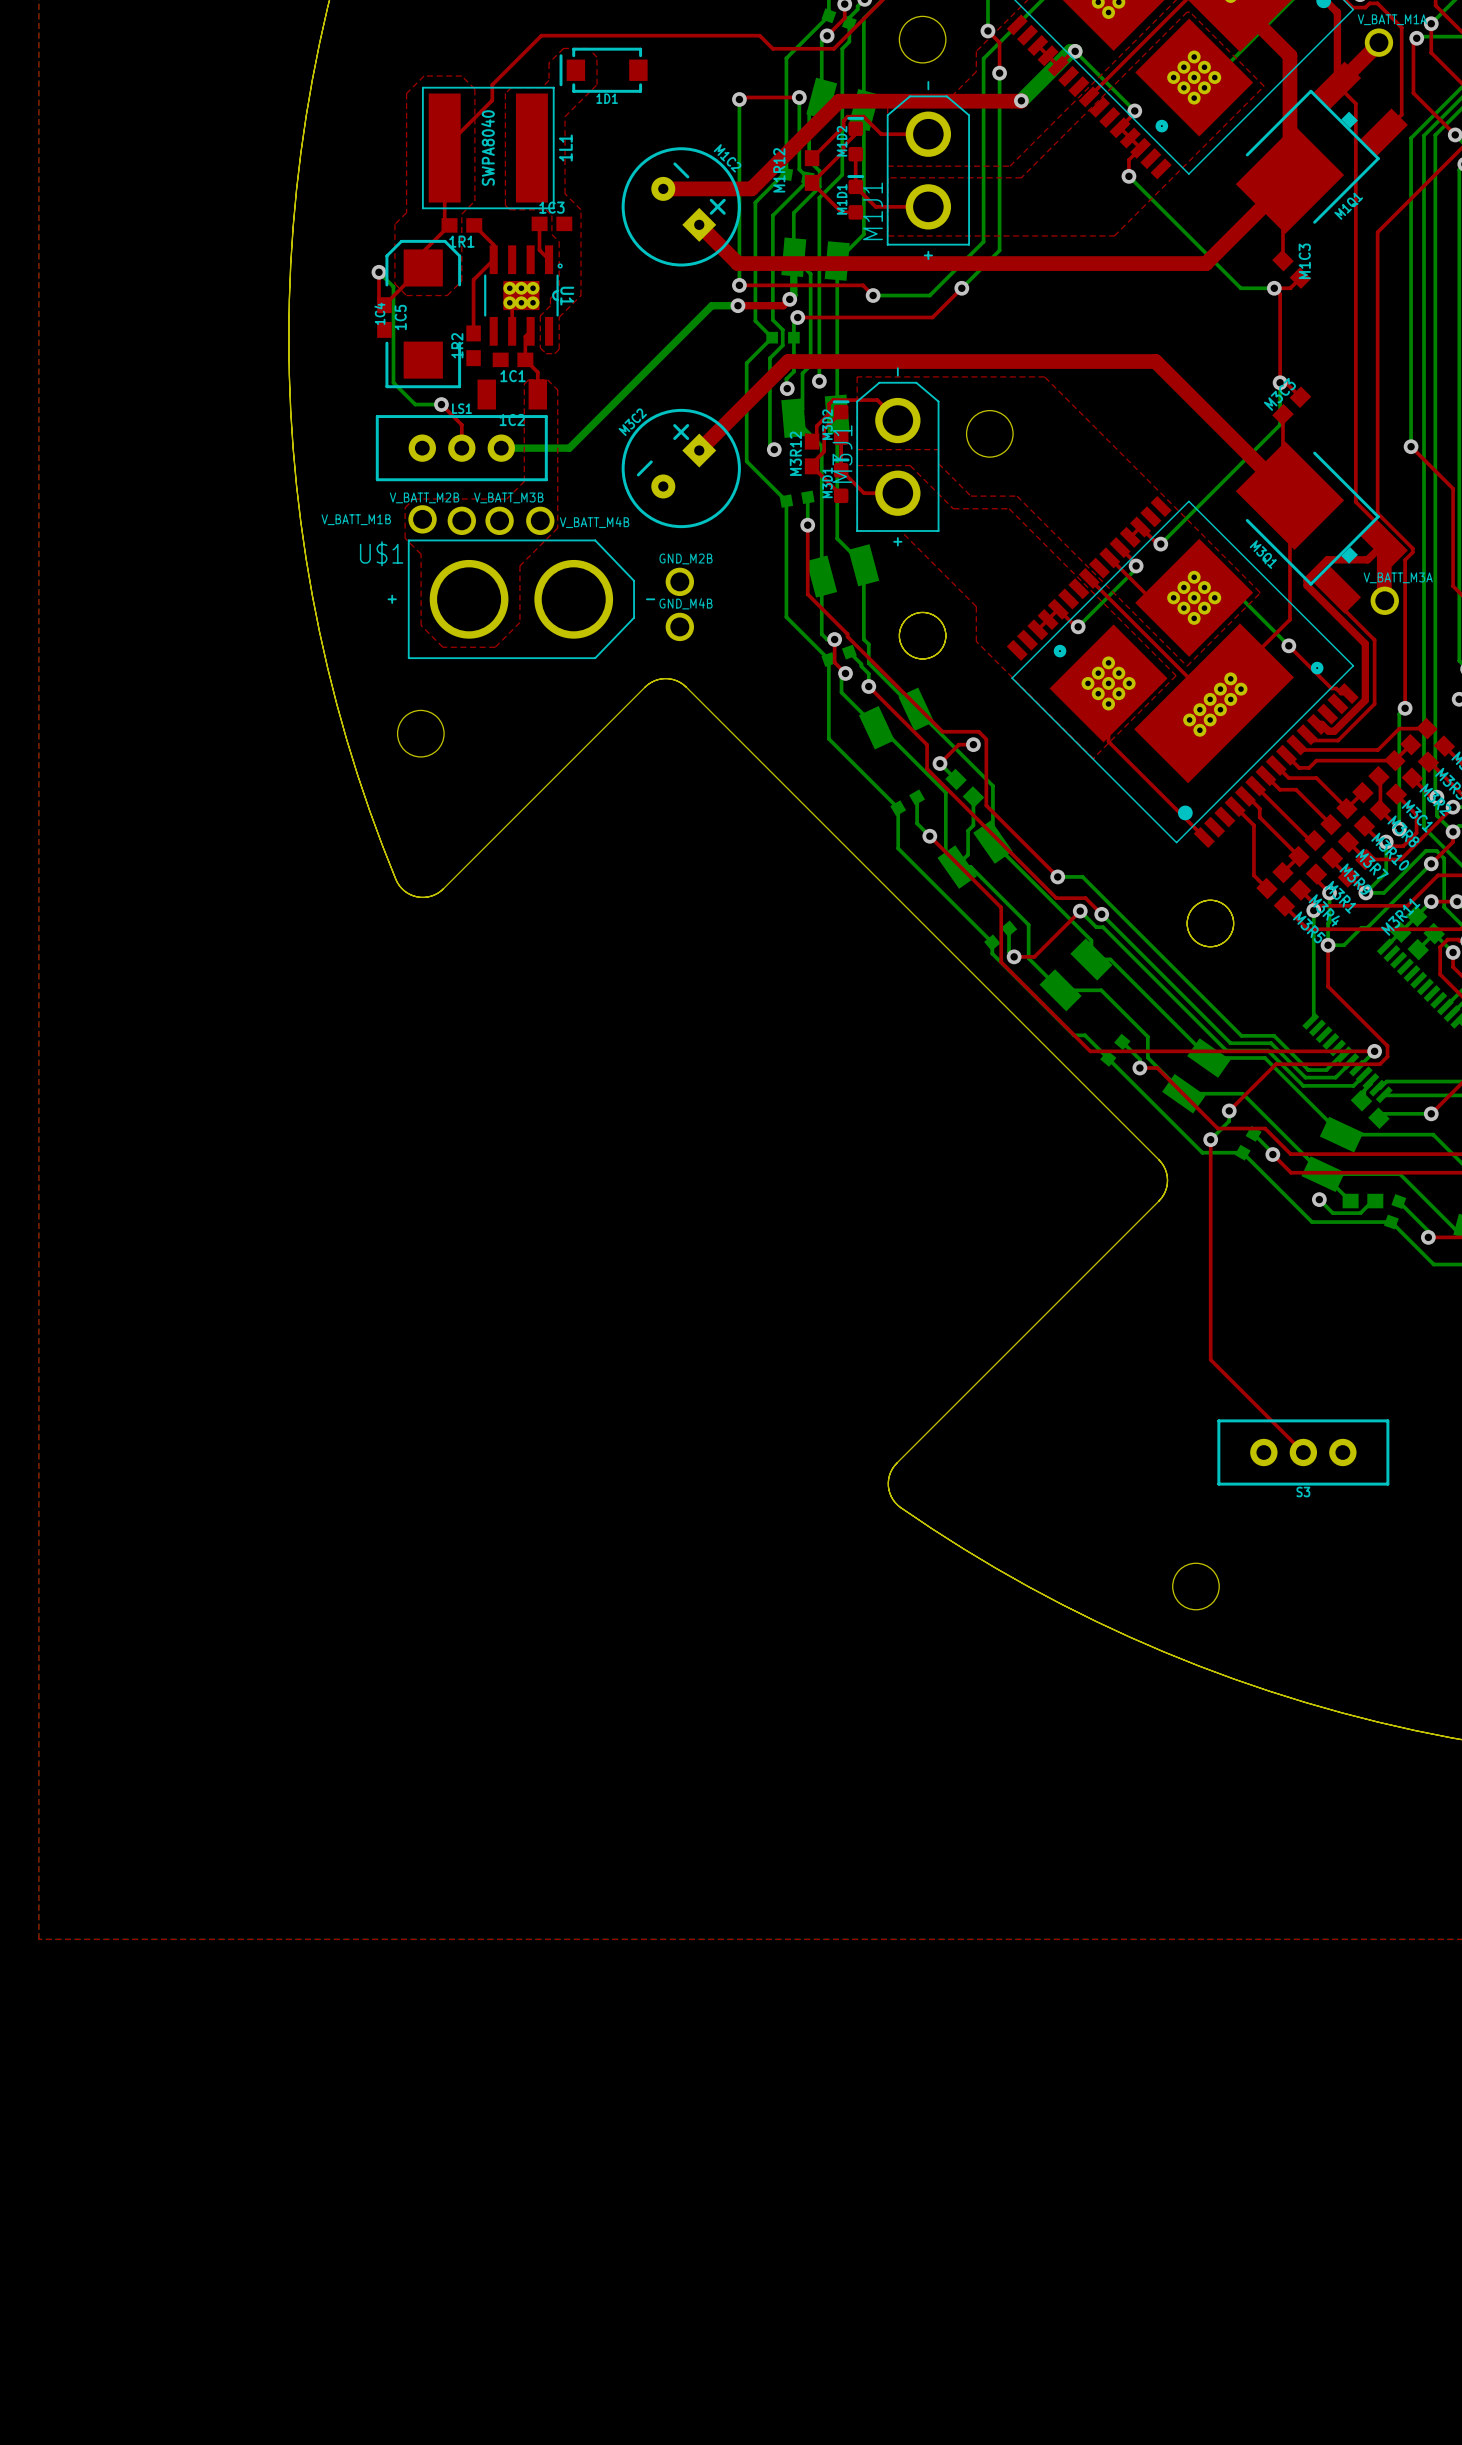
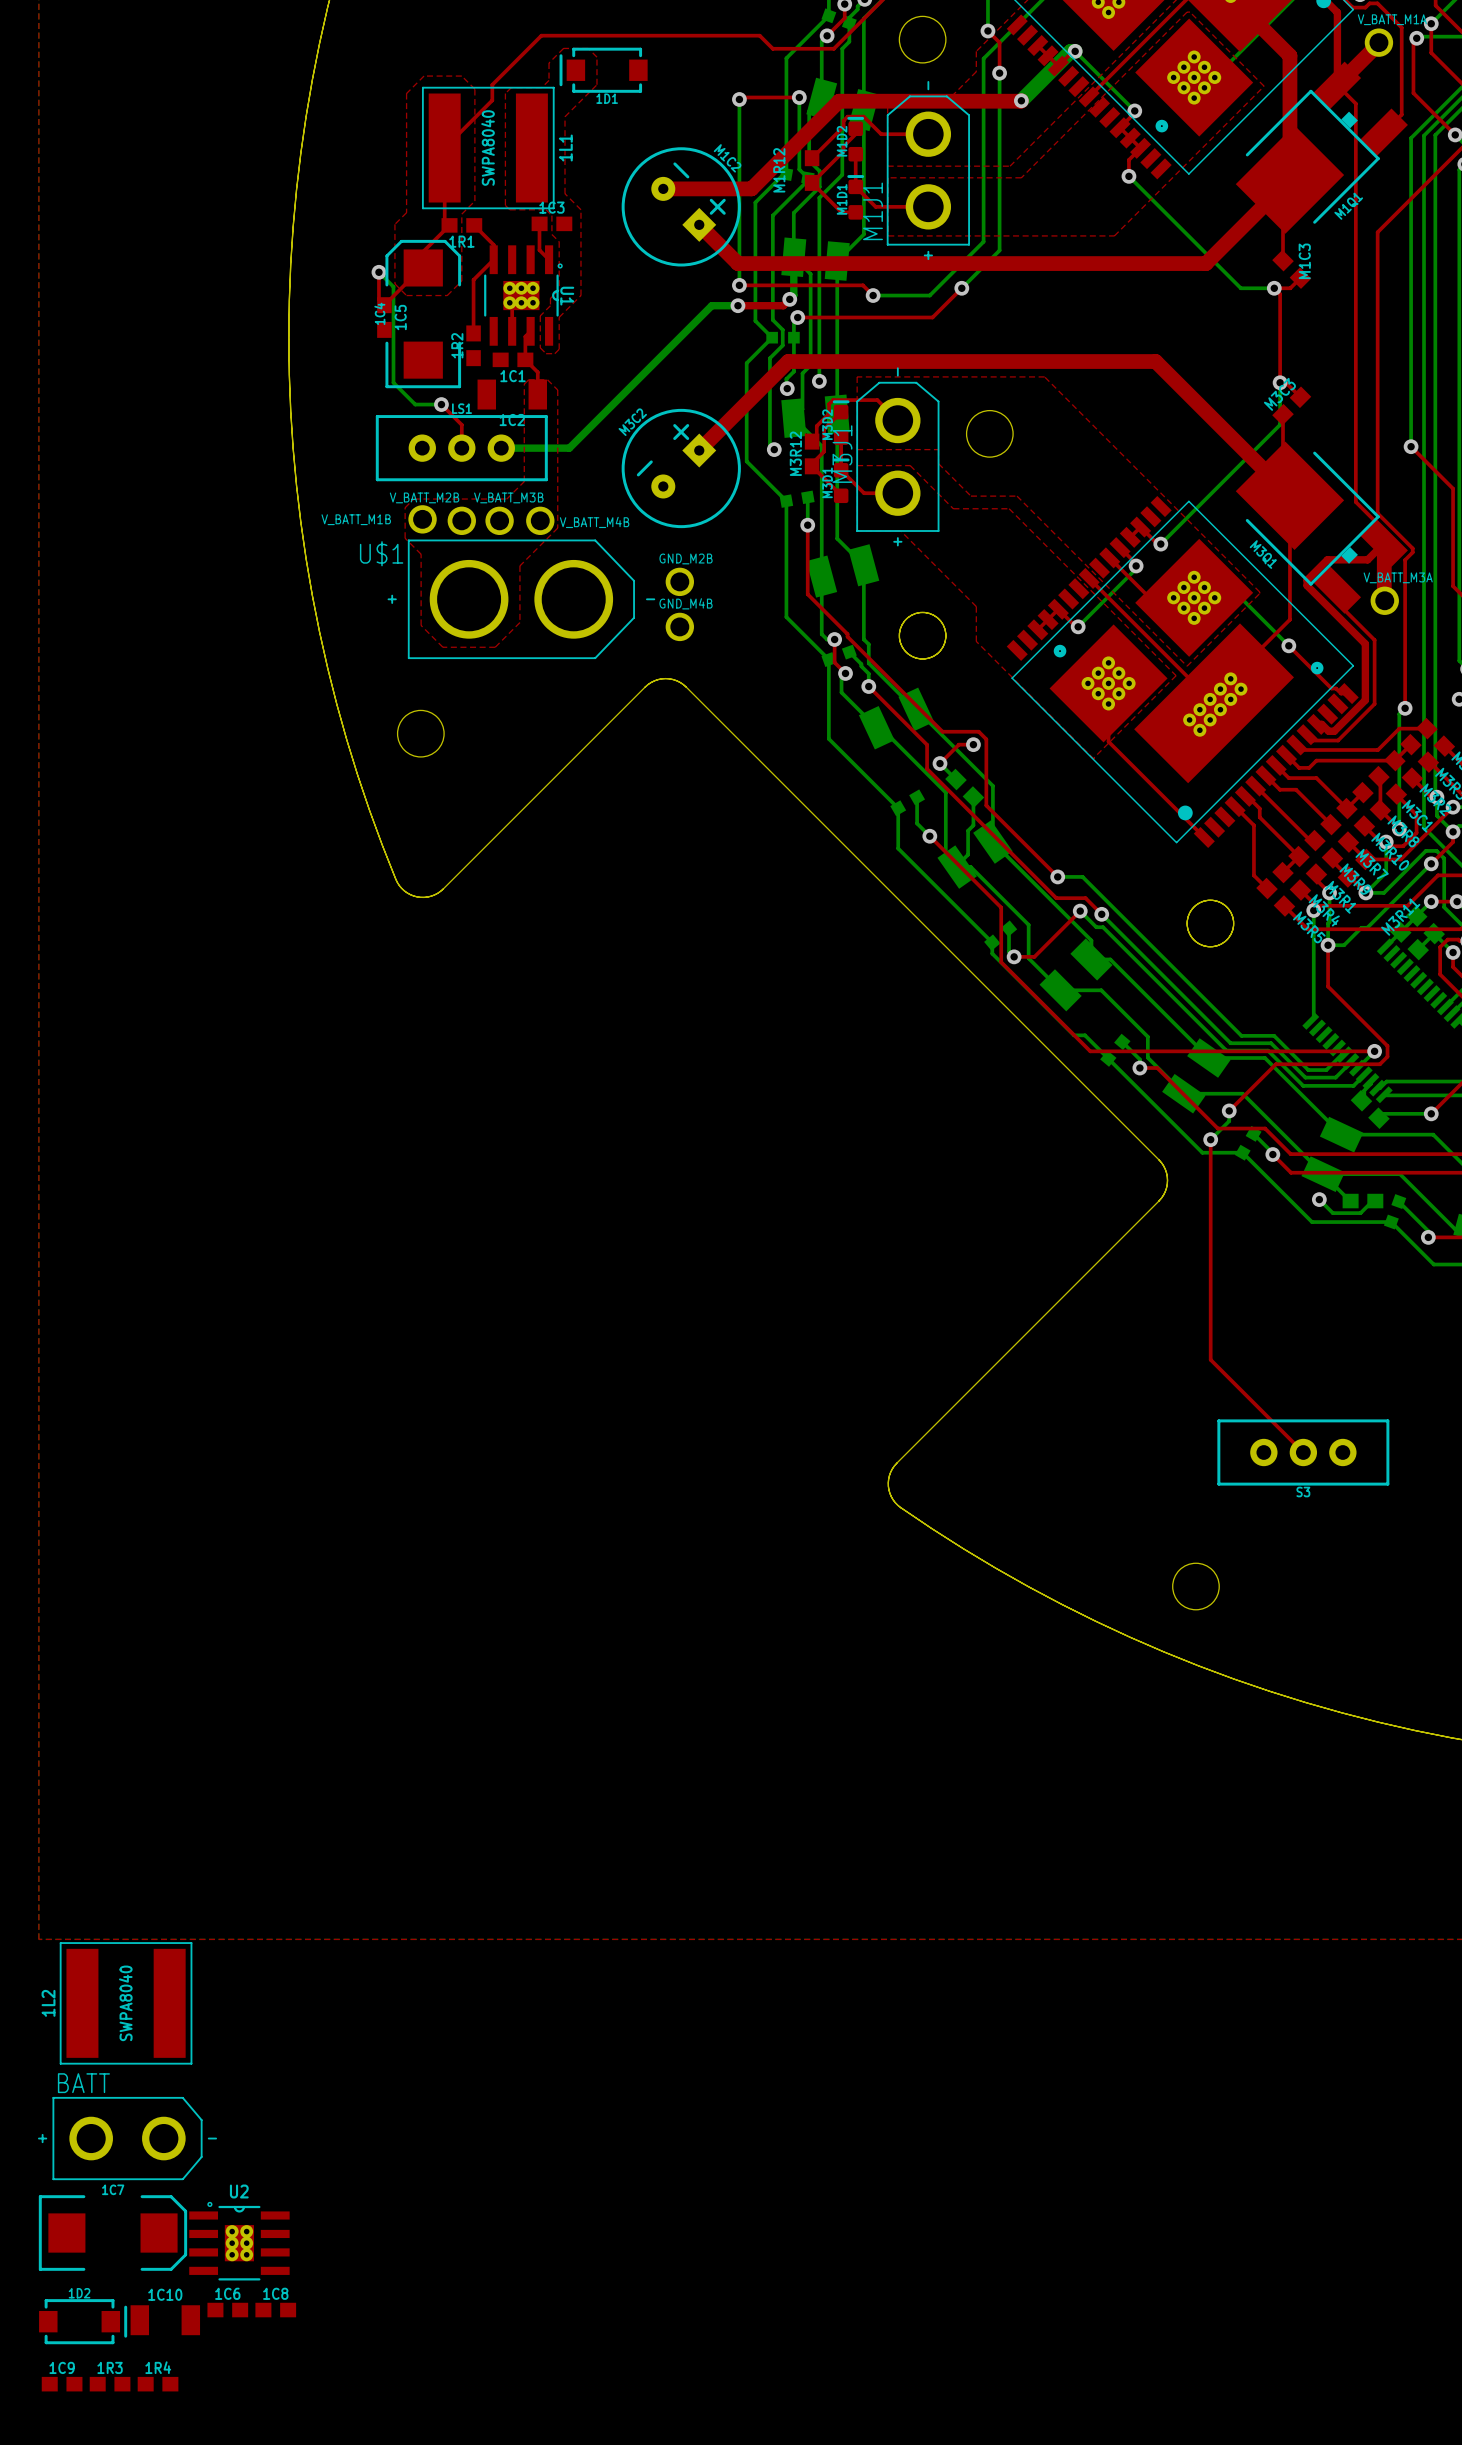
1L2: none -> (126, 2003)
BATT: none -> (127, 2138)
1C7: none -> (112, 2233)
U2: none -> (239, 2241)
1C6: none -> (227, 2310)
1C8: none -> (275, 2310)
1C10: none -> (165, 2320)
1D2: none -> (83, 2321)
1C9: none -> (62, 2384)
1R3: none -> (110, 2384)
1R4: none -> (158, 2384)

